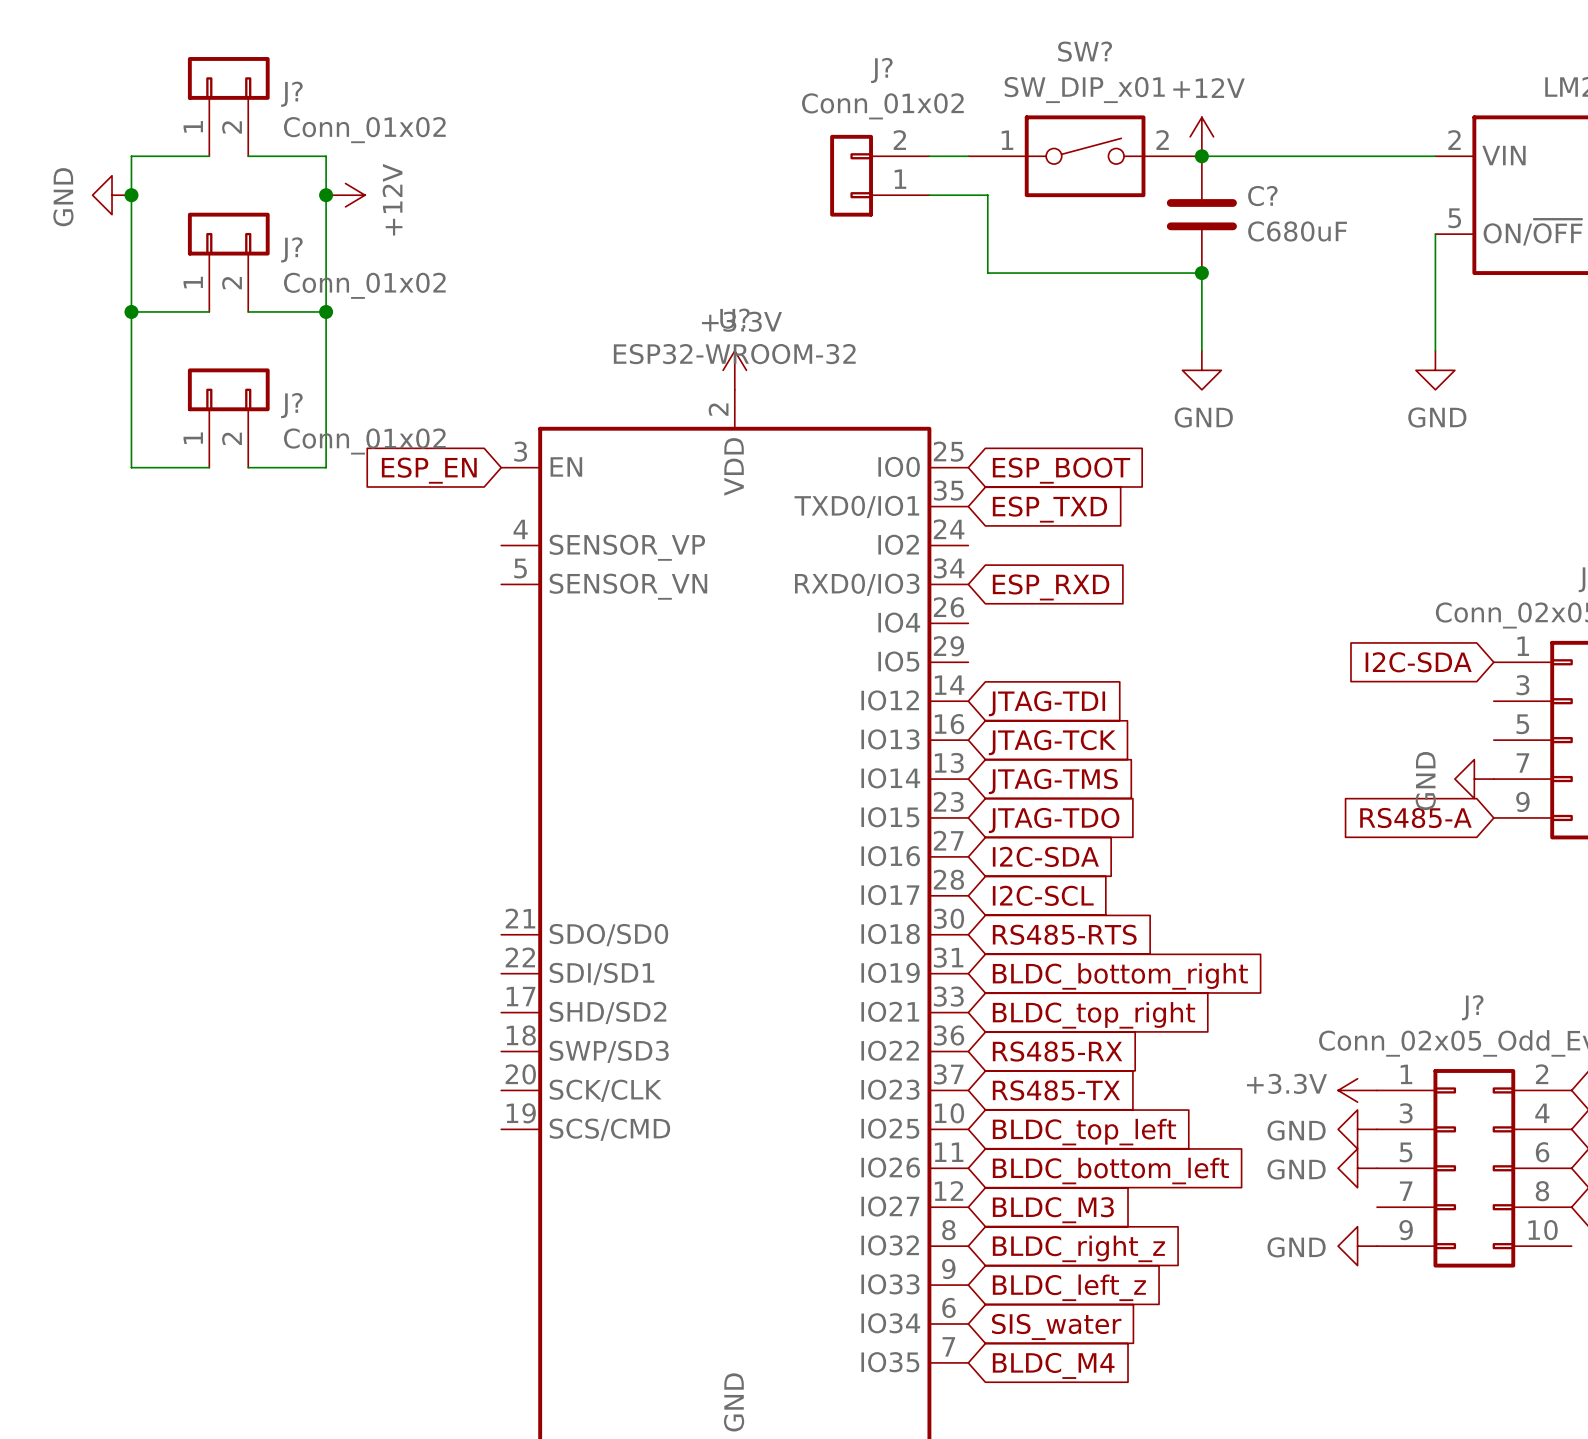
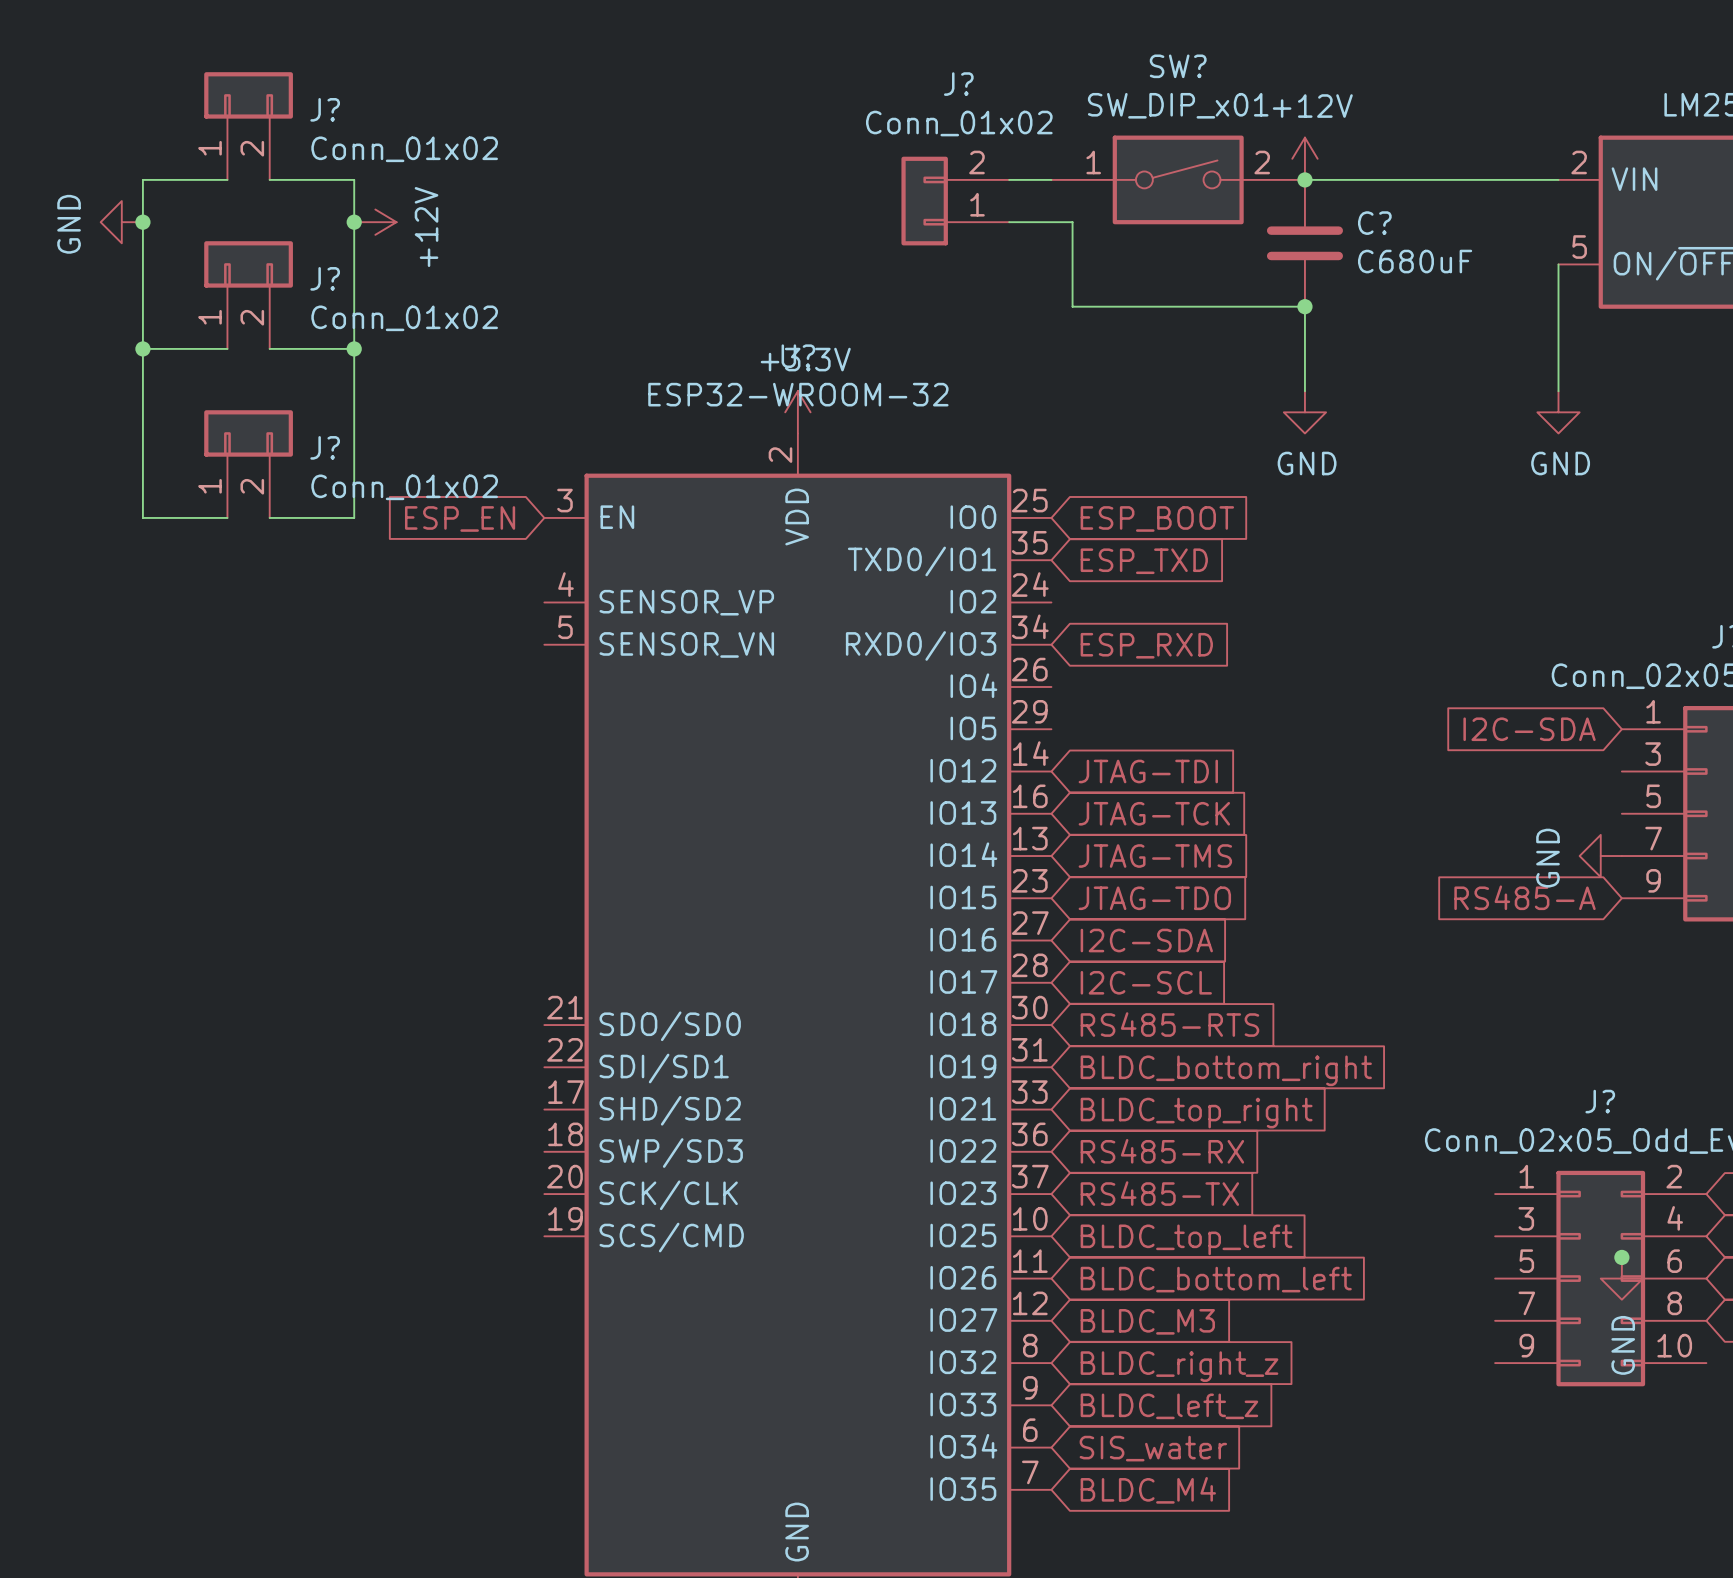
power symbol: +3.3V (1357, 1090) -> none
power symbol: GND (1357, 1129) -> none
junction: none -> (1621, 1257)
power symbol: GND (1357, 1168) -> none
power symbol: none -> GND (1621, 1278)
power symbol: GND (1357, 1246) -> none

